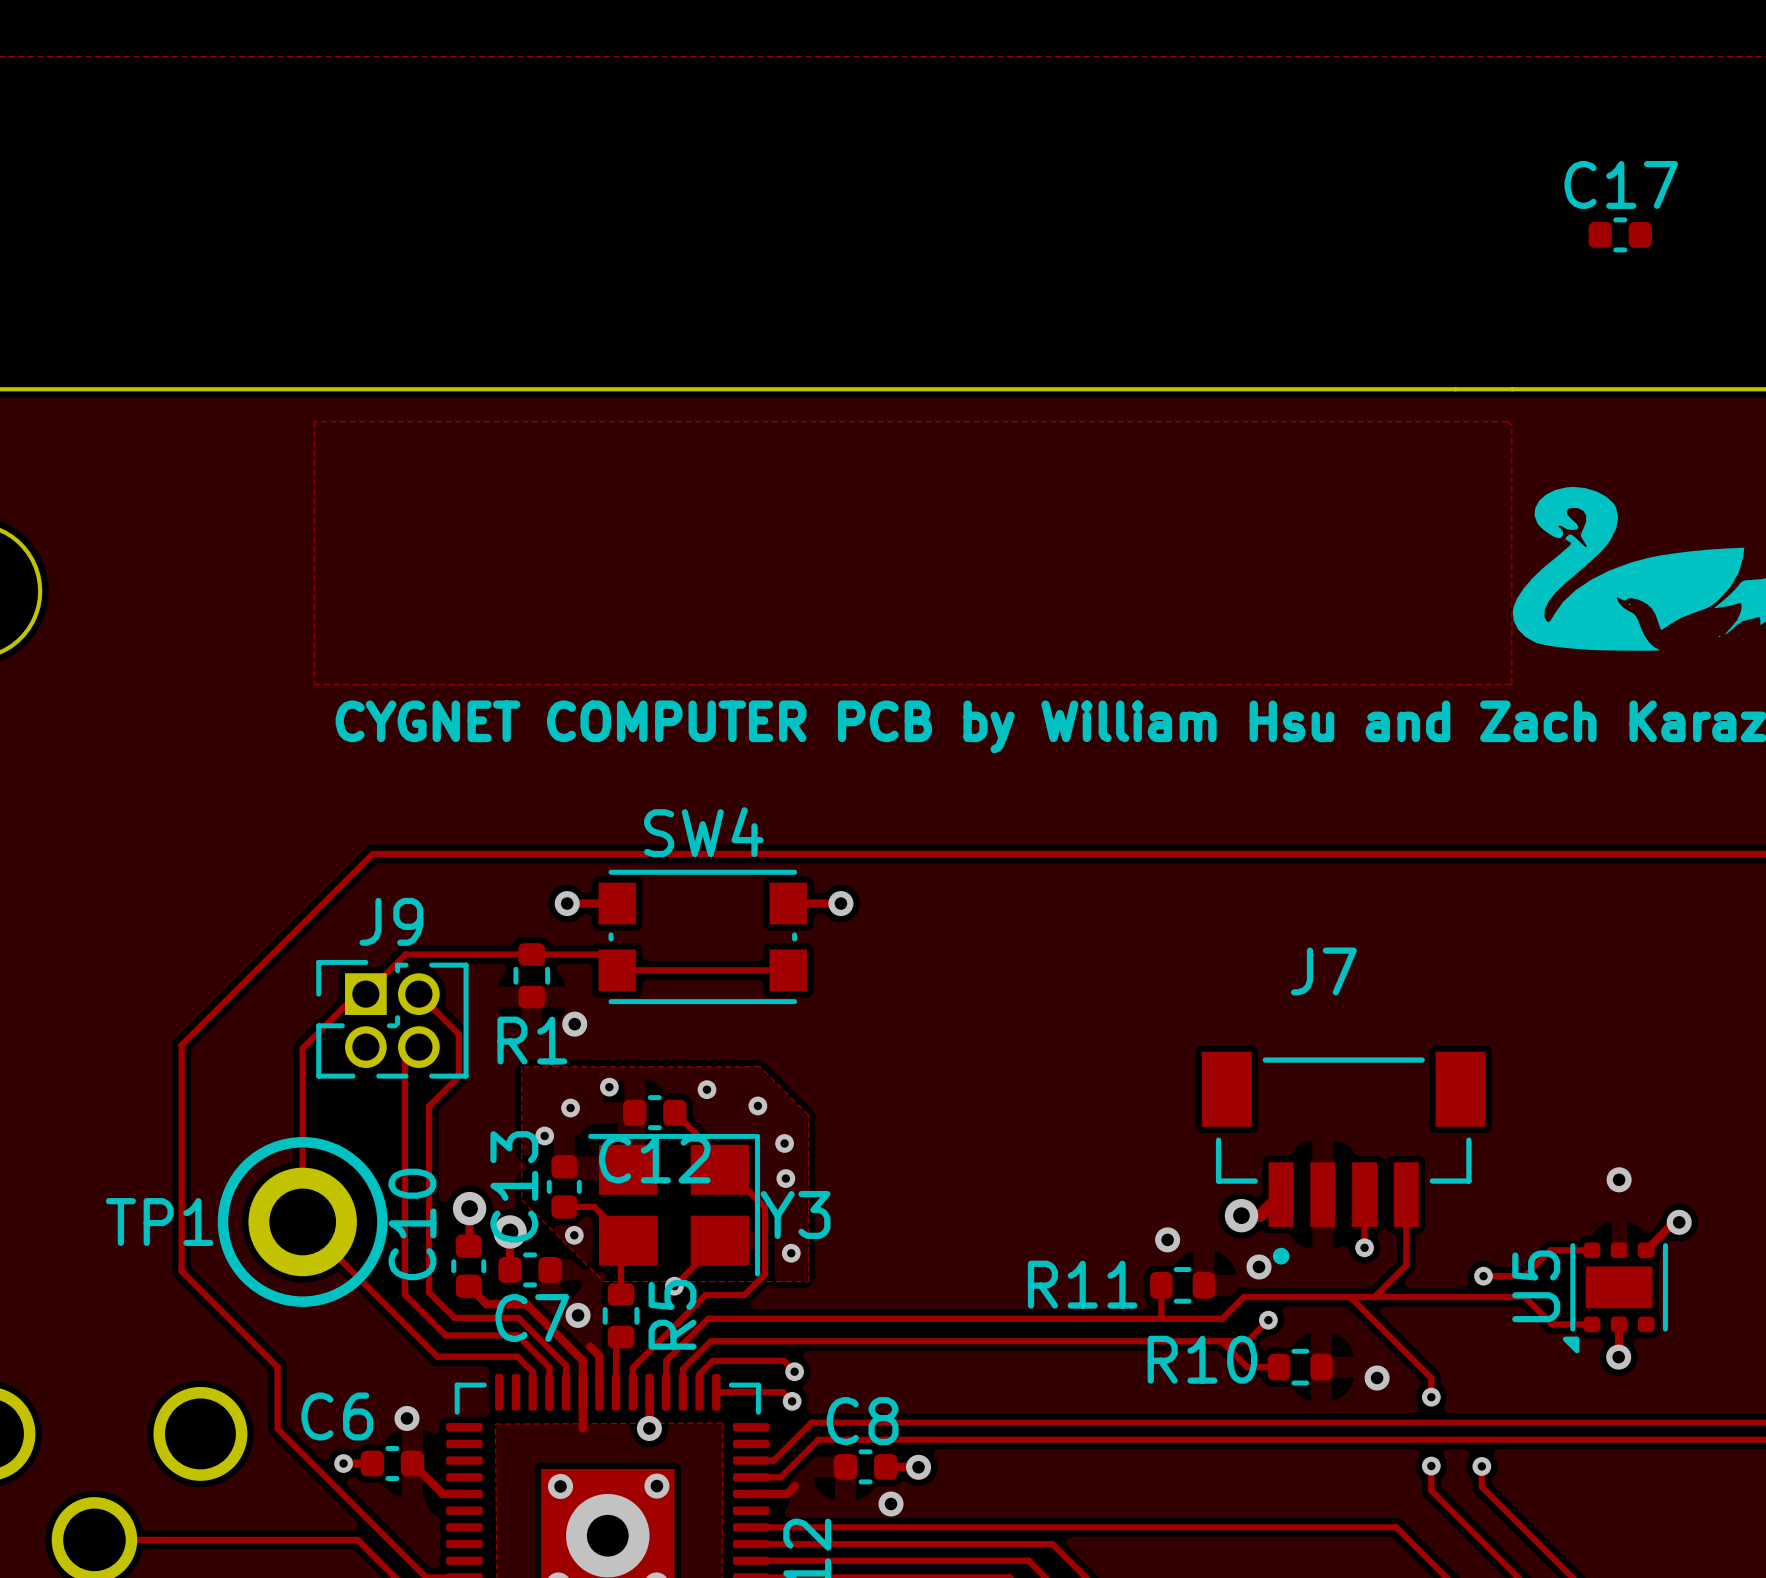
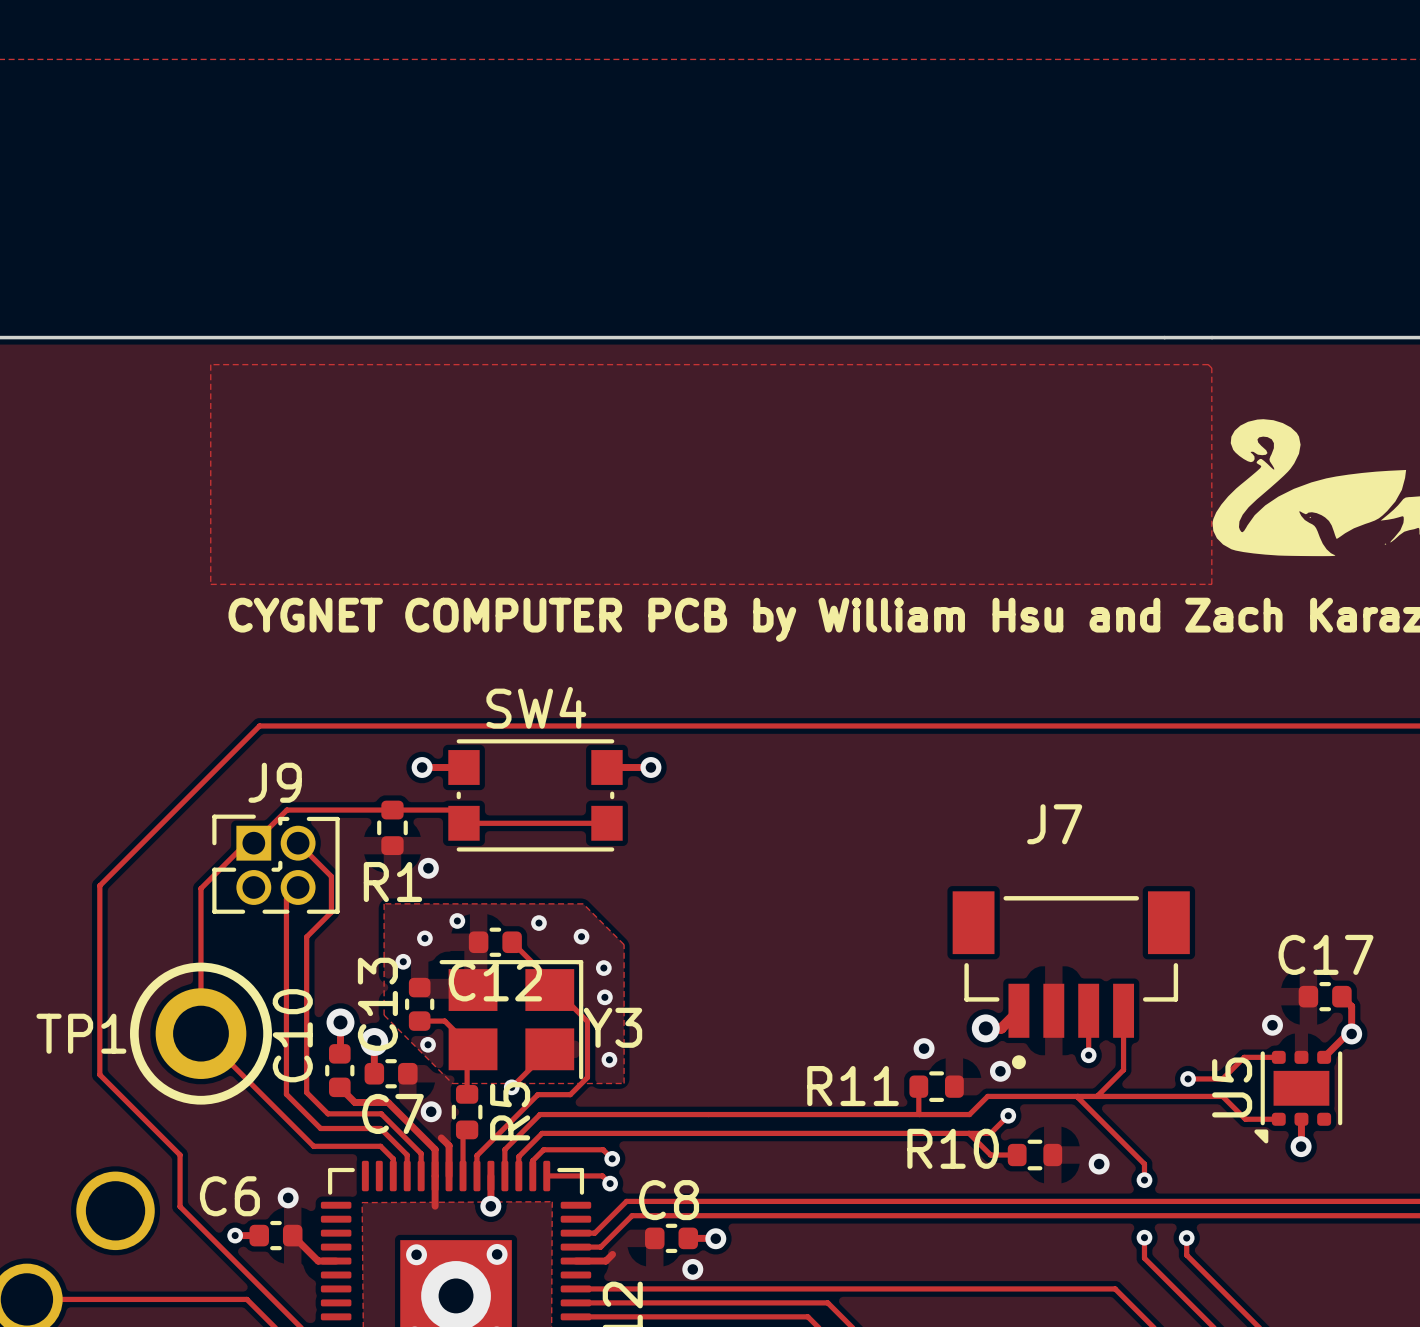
C17 position: (1620, 234) -> (1325, 996)
track: none -> (1341, 996) (1351, 1006) (1351, 1033)
via position: (1619, 1179) -> (1272, 1025)

